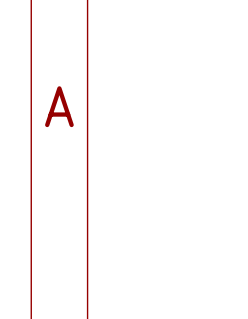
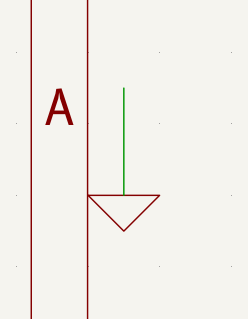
wire: none -> (123, 88) (123, 195)
power symbol: none -> (123, 213)

